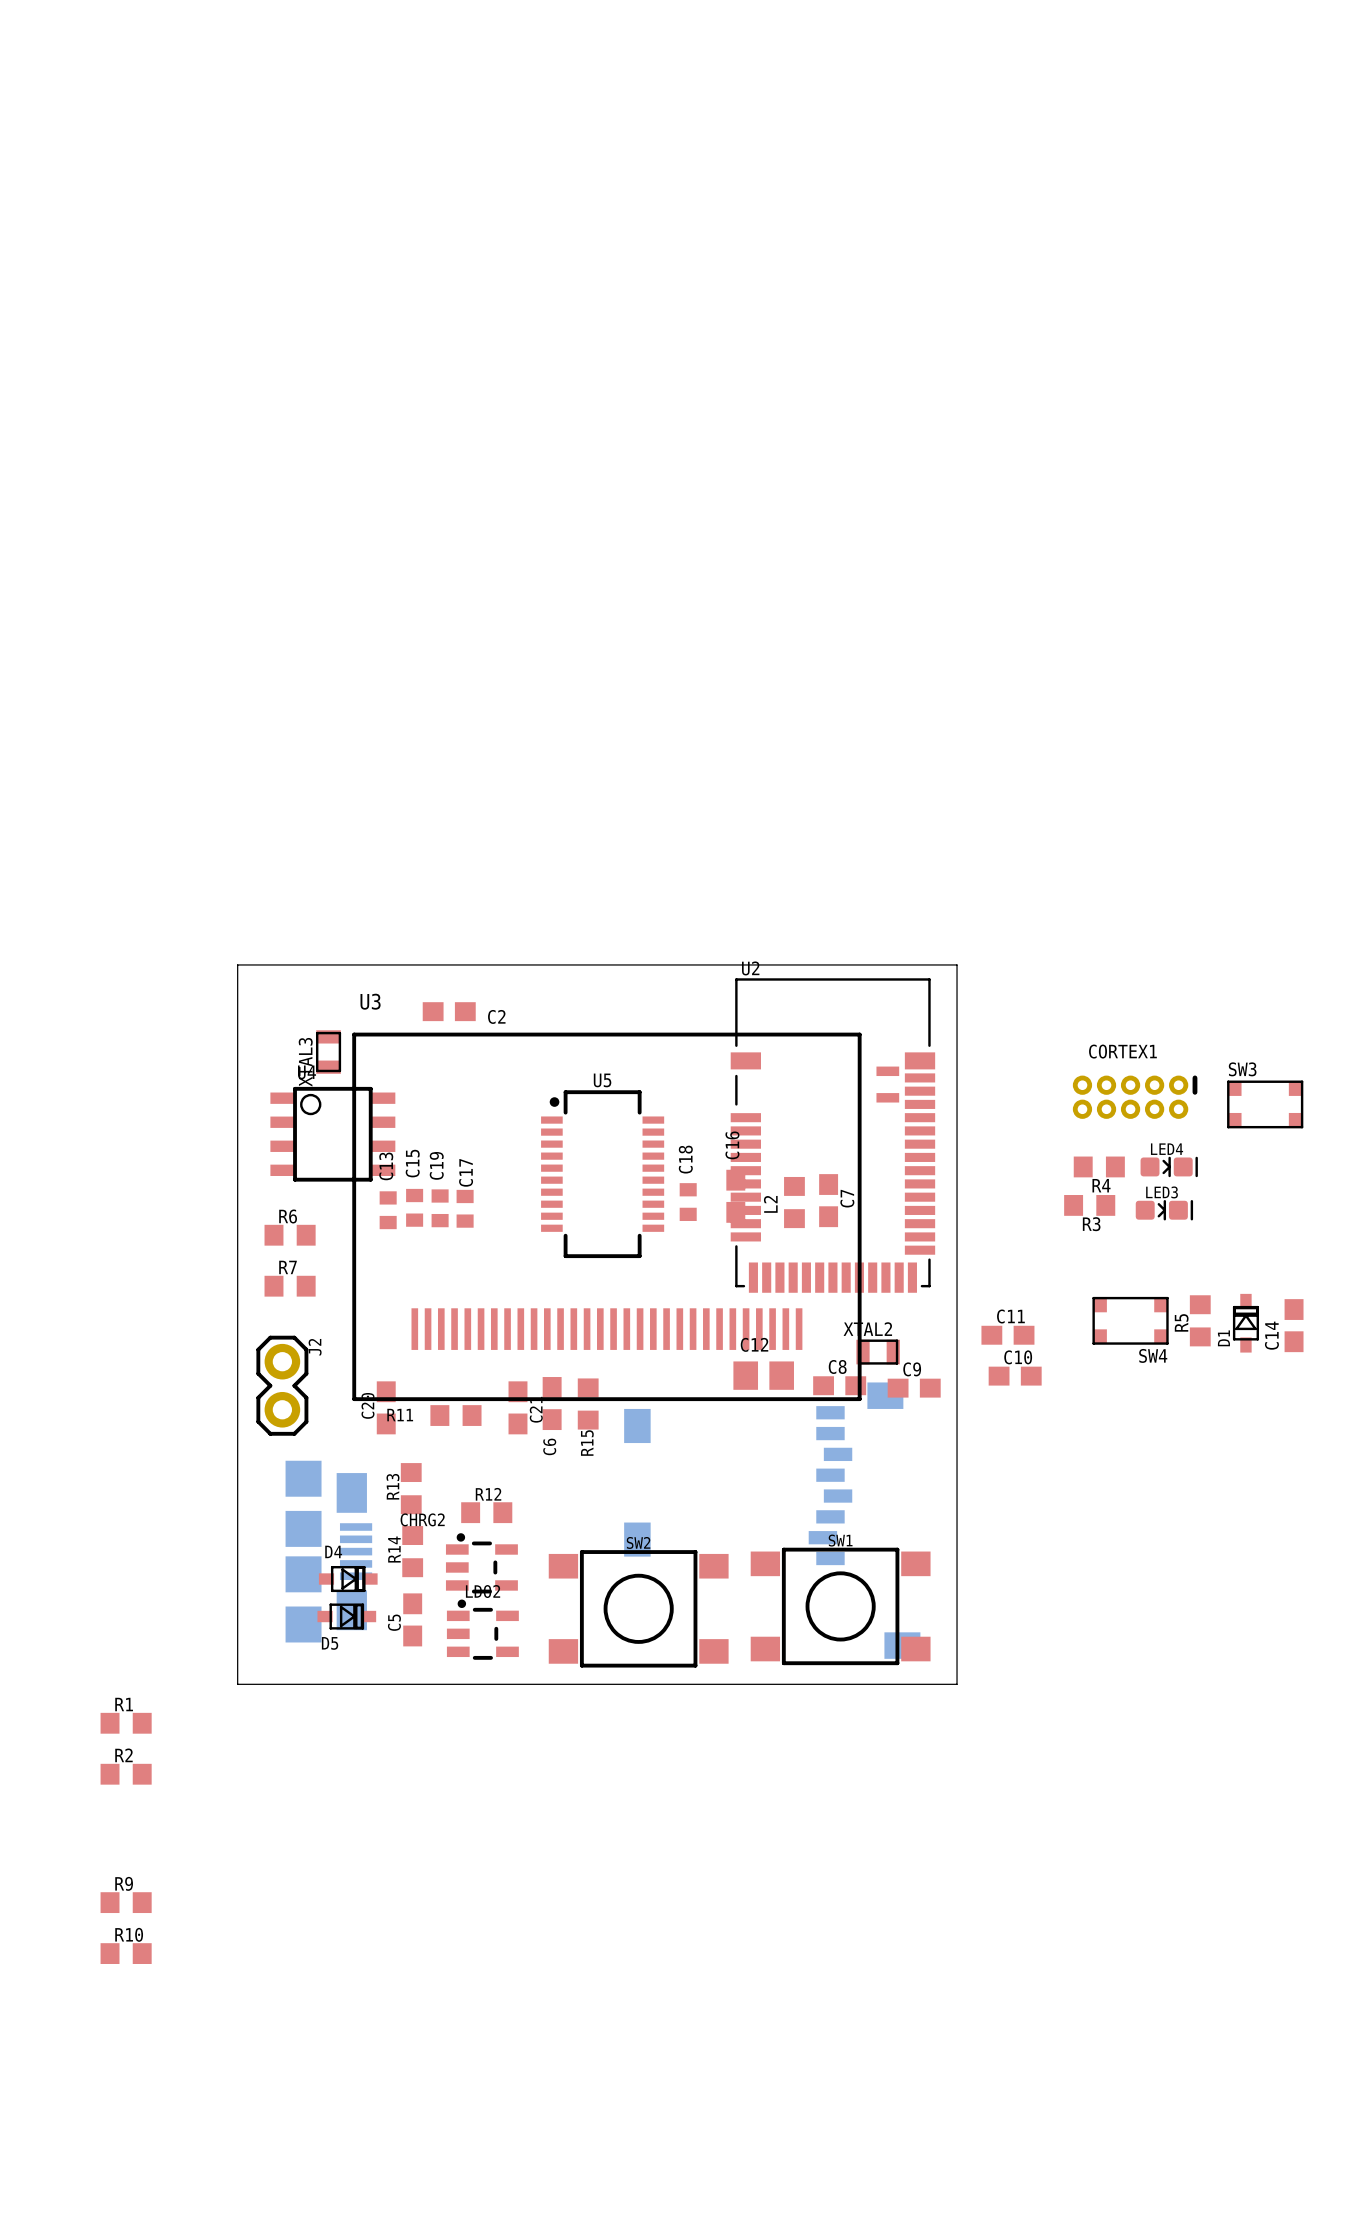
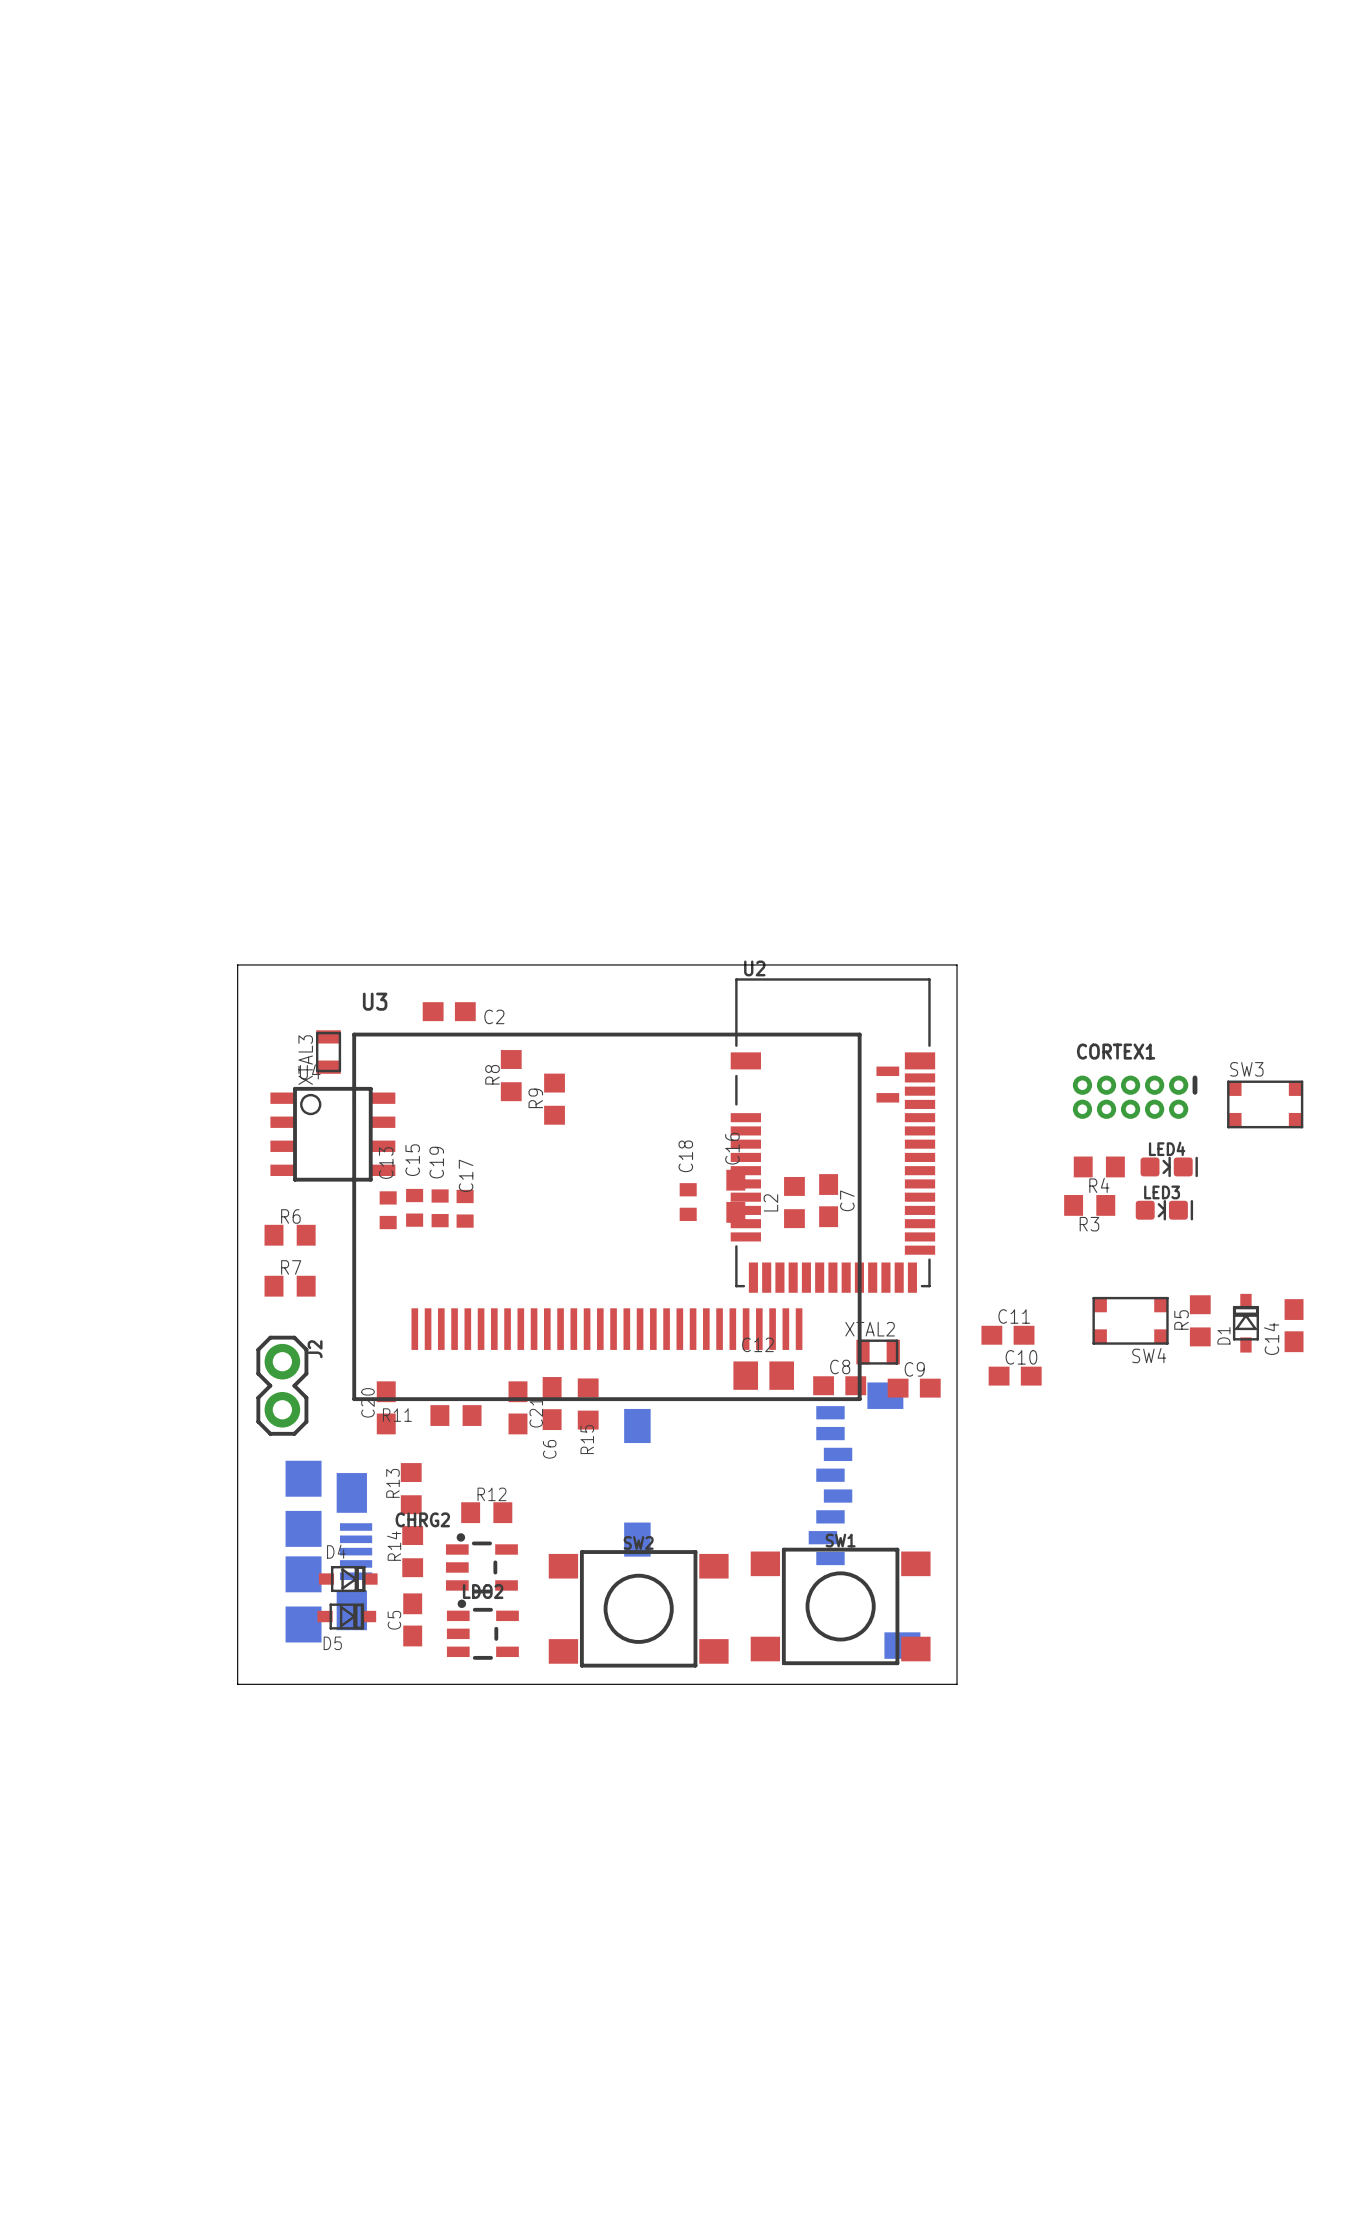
R8: none -> (511, 1075)
U5: (602, 1174) -> none
R1: (126, 1723) -> none
R2: (126, 1774) -> none
R9 rotation: 0° (126, 1902) -> 90° clockwise (554, 1099)
R9 position: (126, 1902) -> (554, 1099)
R10: (126, 1953) -> none

